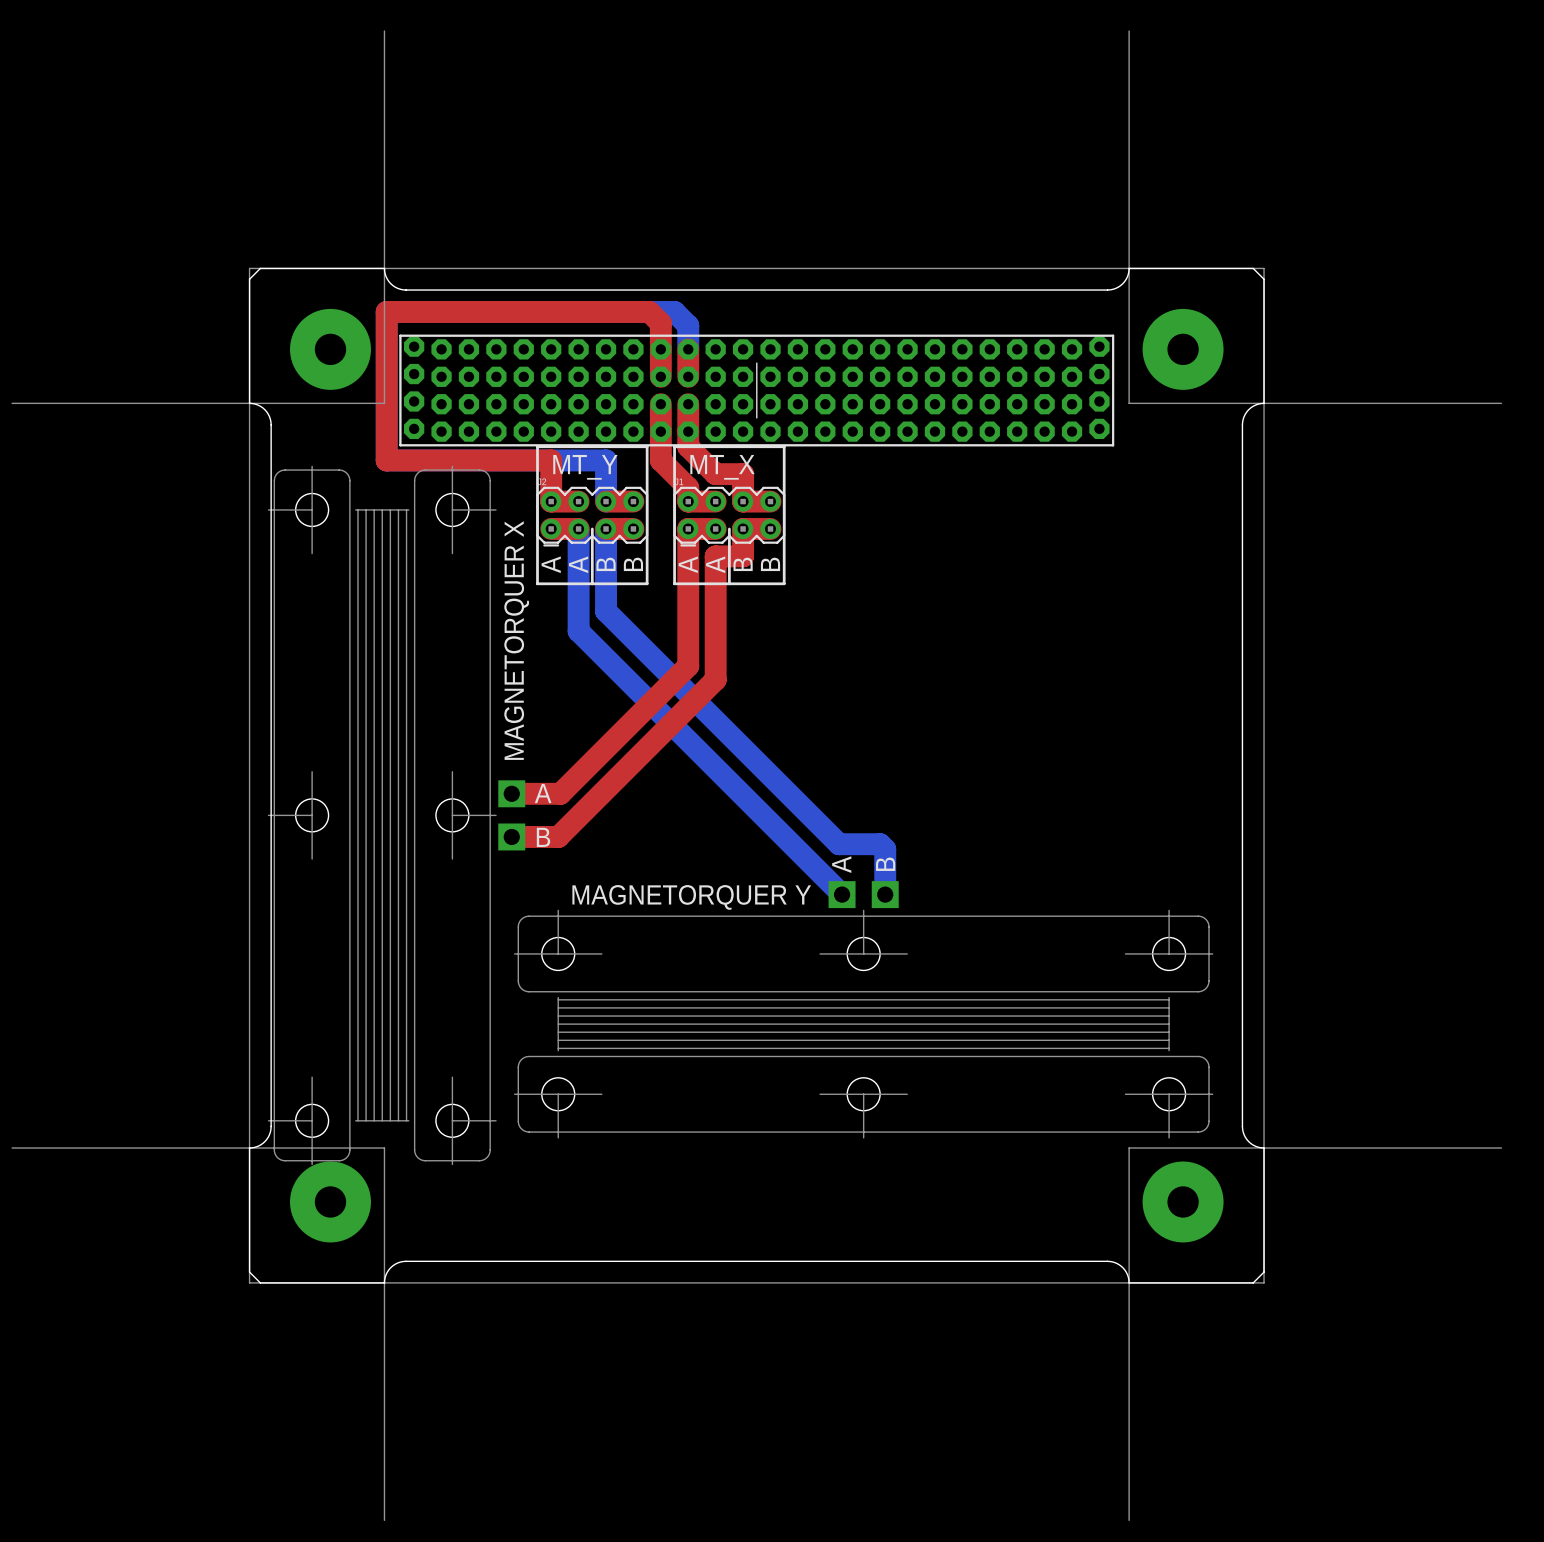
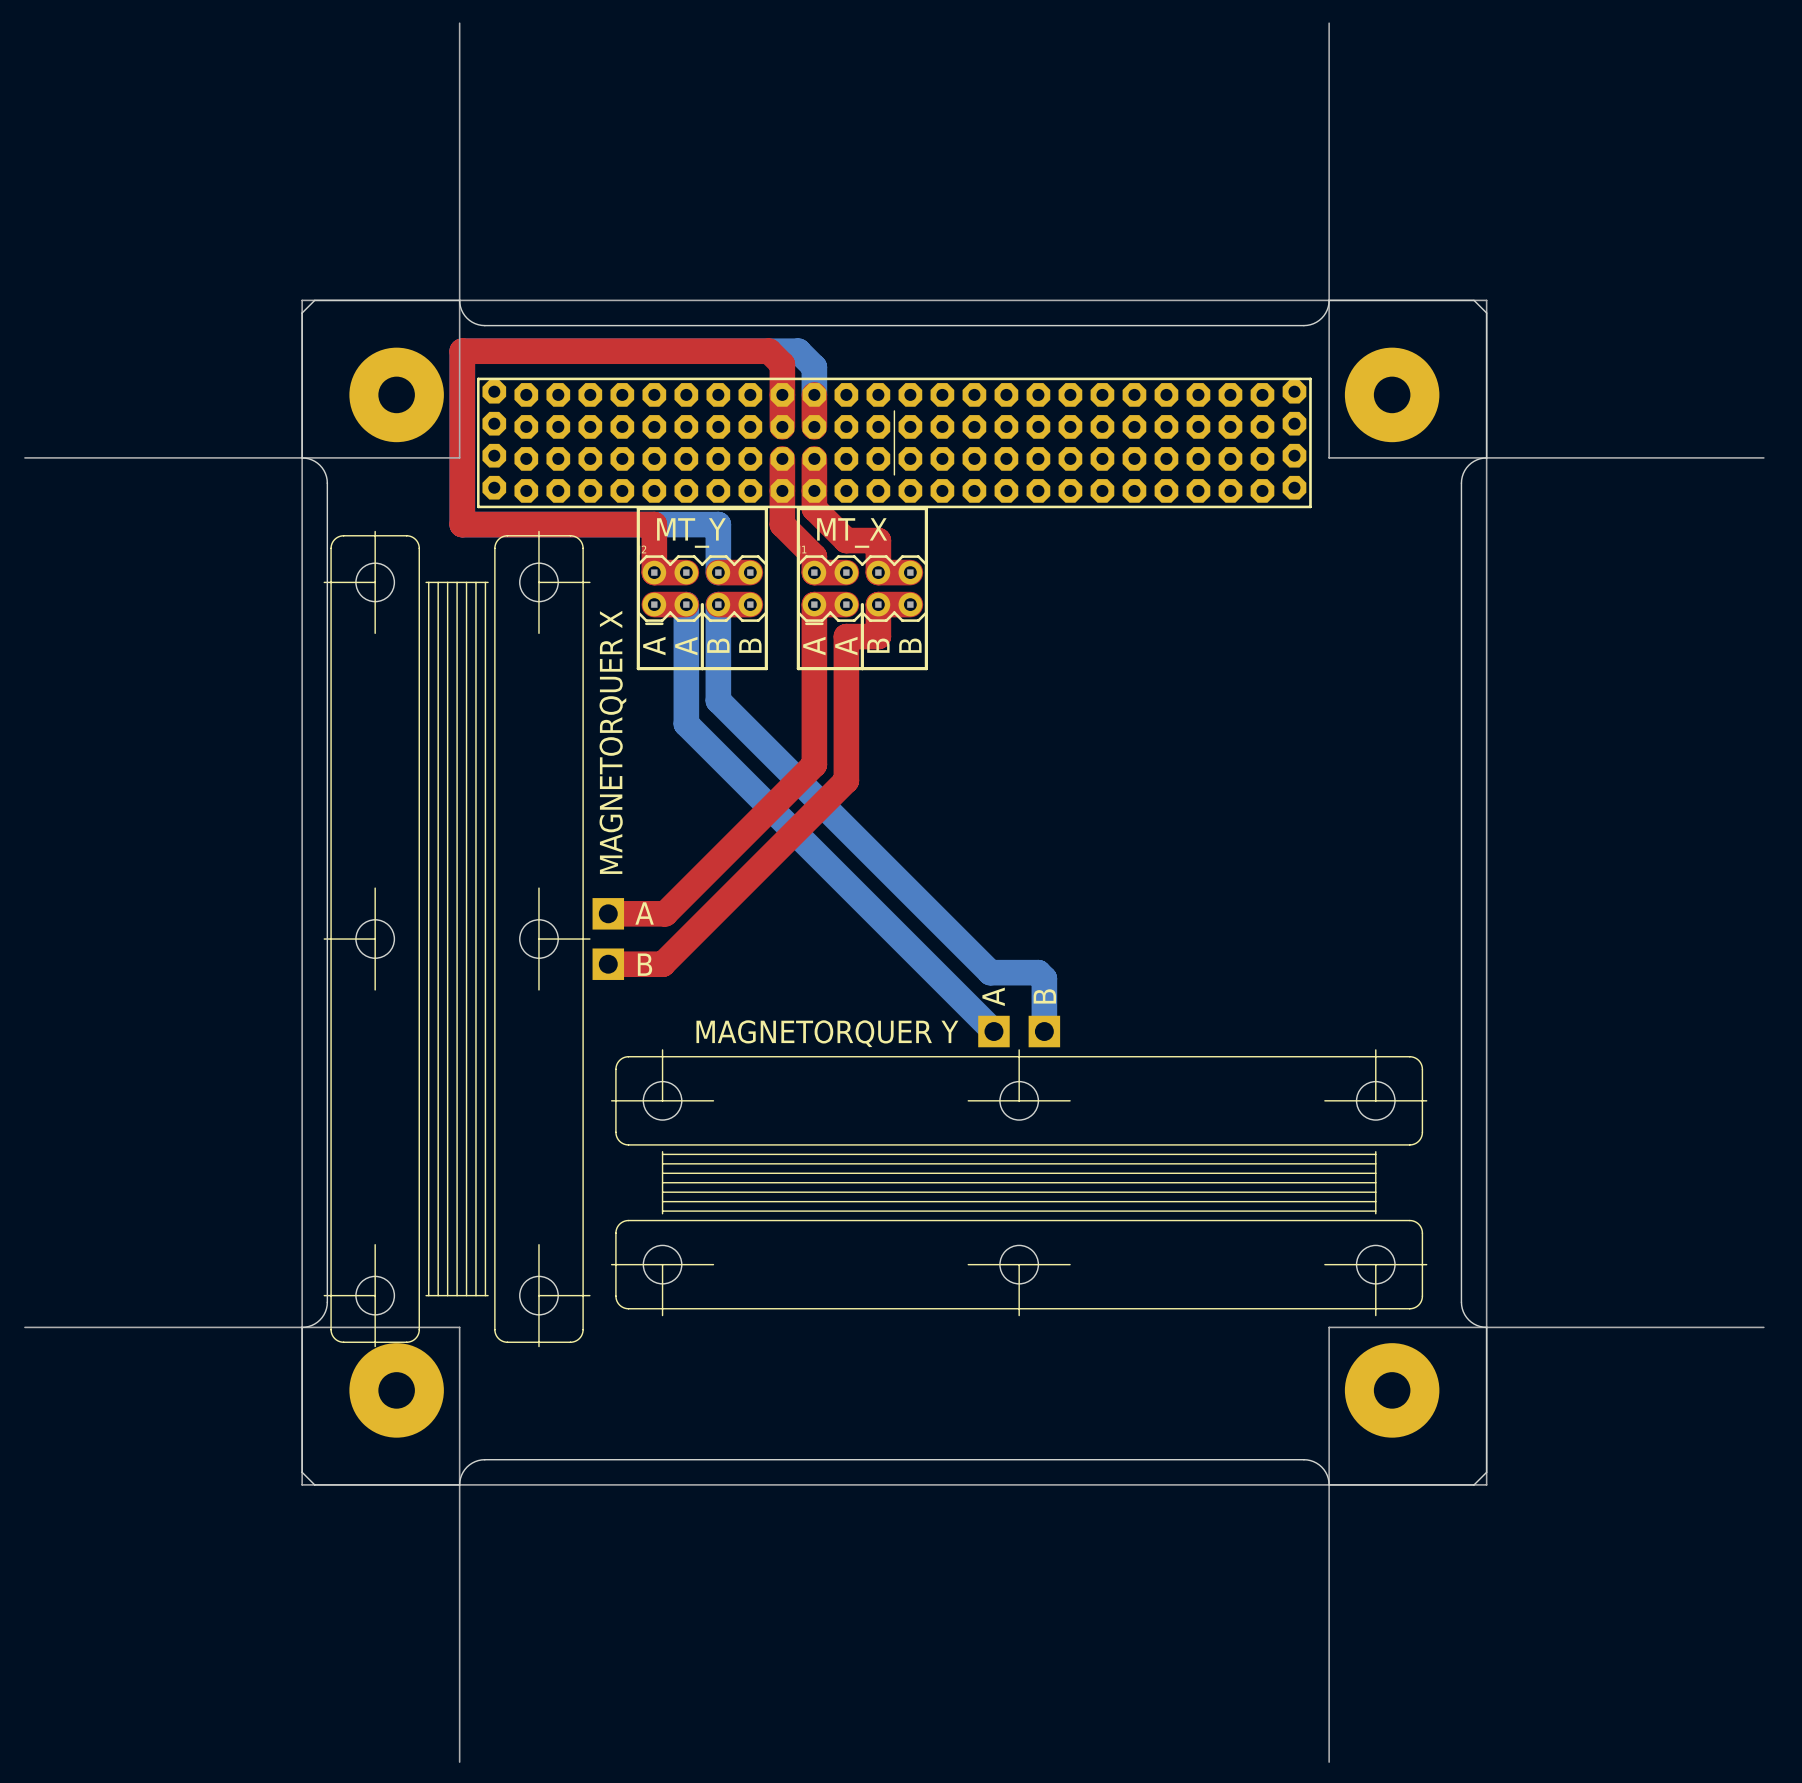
part footprint: [268, 466, 526, 1165] -> [324, 531, 625, 1347]
part footprint: [514, 881, 1213, 1138] -> [611, 1015, 1427, 1316]

